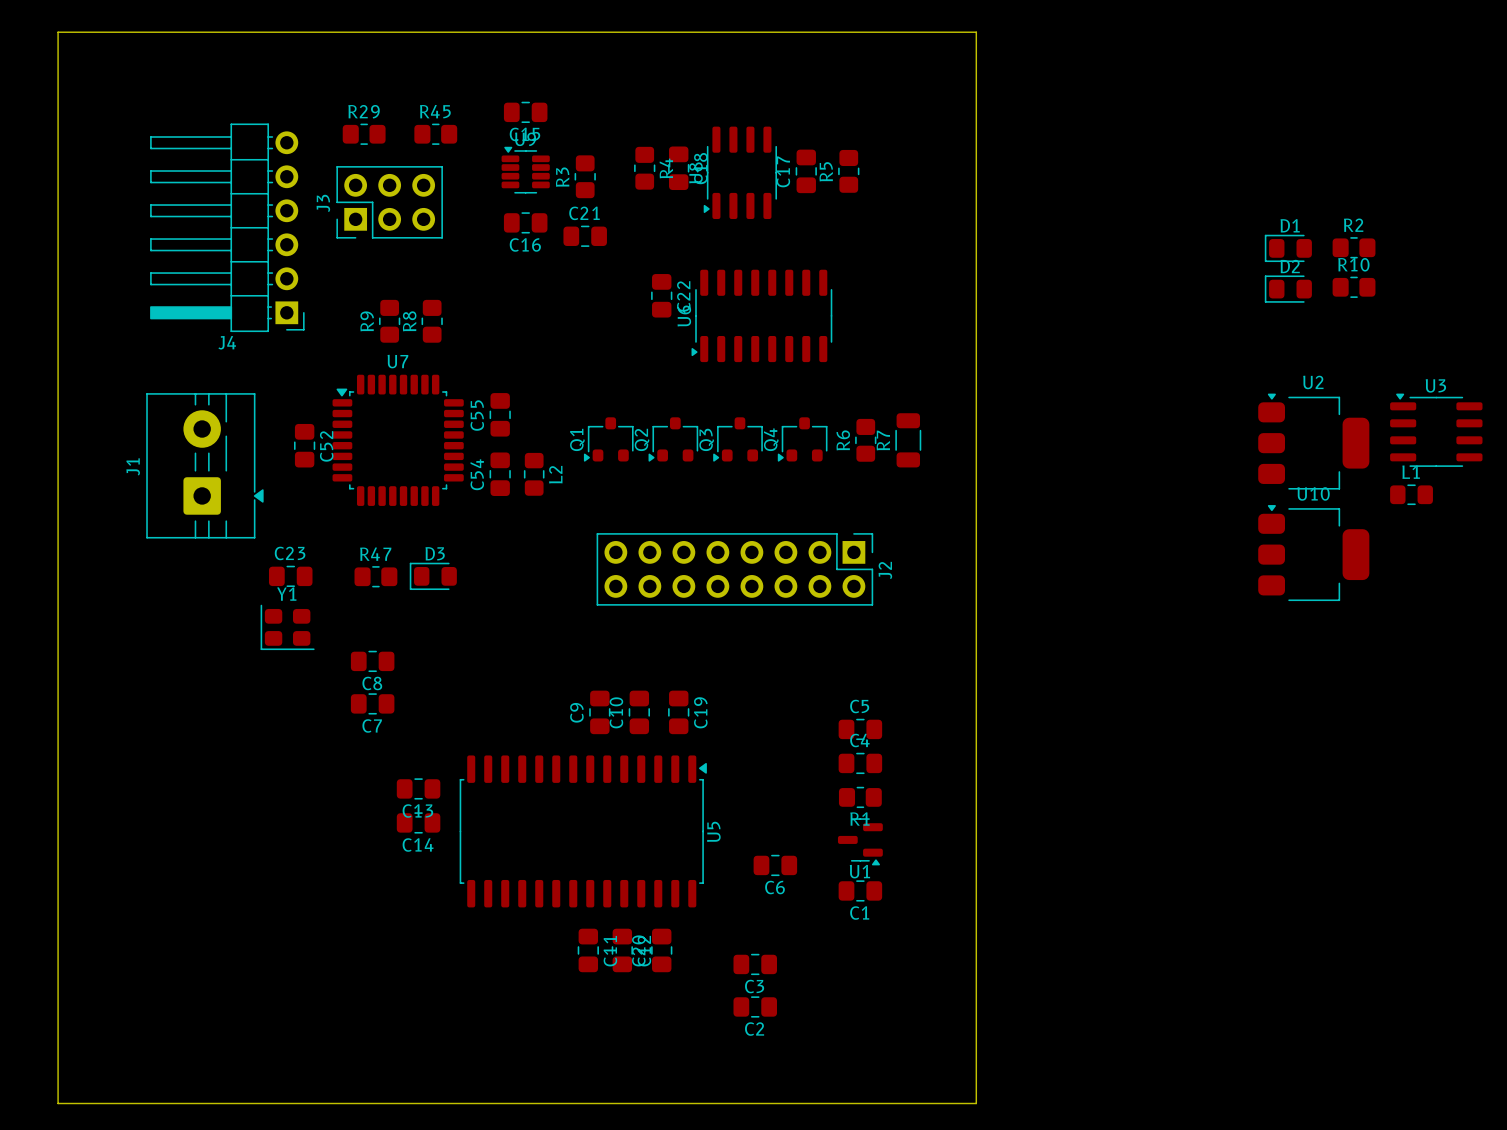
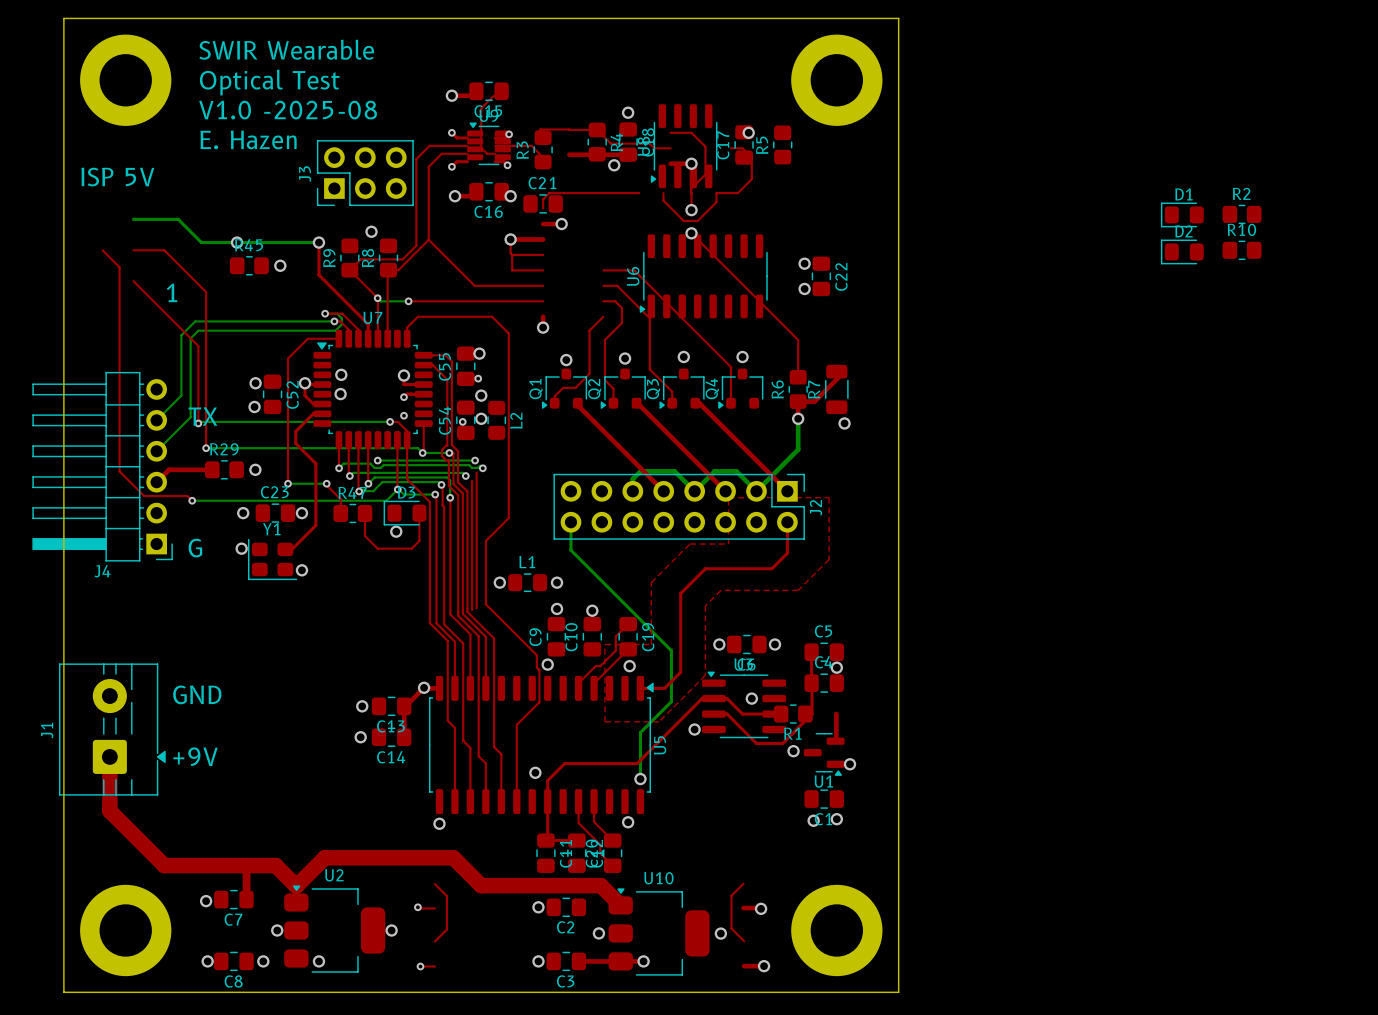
text: none -> SWIR Wearable (286, 49)
part: none -> (125, 80)
part: none -> (836, 80)
text: none -> Optical Test (269, 82)
top track: none -> (451, 95) (468, 95)
via: none -> (451, 95)
top track: none -> (493, 95) (481, 108) (481, 148) (487, 153) (495, 153)
text: none -> V1.0 -2025-08 (288, 110)
R29 position: (364, 134) -> (224, 469)
R45 position: (435, 134) -> (249, 265)
via: none -> (628, 112)
top track: none -> (540, 129) (597, 129) (610, 143) (649, 143) (654, 148) (670, 148)
top track: none -> (451, 132) (457, 137) (467, 137)
via: none -> (451, 132)
top track: none -> (670, 132) (691, 132) (705, 146) (705, 174) (691, 188) (691, 210)
via: none -> (748, 132)
top track: none -> (509, 134) (505, 137) (495, 137)
via: none -> (509, 134)
text: none -> E. Hazen (248, 139)
top track: none -> (467, 145) (429, 145) (416, 159) (416, 245) (402, 259) (360, 259) (349, 270) (377, 298) (377, 338)
top track: none -> (495, 145) (531, 145) (540, 154)
top track: none -> (730, 148) (742, 148) (751, 157) (751, 179) (737, 193) (716, 193) (716, 202) (697, 220) (683, 220) (663, 200) (663, 193)
top track: none -> (467, 153) (441, 153) (428, 166) (428, 239)
top track: none -> (569, 154) (628, 154)
top track: none -> (467, 161) (457, 161) (451, 166)
top track: none -> (495, 161) (503, 161) (507, 165)
top track: none -> (670, 163) (691, 163)
via: none -> (691, 163)
via: none -> (507, 165)
via: none -> (614, 165)
via: none -> (451, 166)
text: none -> ISP 5V (117, 177)
top track: none -> (639, 193) (549, 193) (543, 199) (543, 208)
J4 position: (227, 227) -> (102, 466)
top track: none -> (455, 196) (468, 196)
via: none -> (455, 196)
via: none -> (510, 196)
via: none -> (691, 210)
bottom track: none -> (133, 219) (178, 219) (201, 242) (318, 242)
top track: none -> (543, 224) (561, 224)
via: none -> (561, 224)
via: none -> (371, 231)
top track: none -> (691, 233) (798, 339) (798, 377)
via: none -> (691, 233)
top track: none -> (428, 239) (398, 270) (387, 271) (387, 338)
top track: none -> (428, 239) (474, 285) (543, 285)
via: none -> (510, 239)
top track: none -> (543, 239) (510, 239) (512, 254)
via: none -> (237, 242)
top track: none -> (318, 242) (318, 275) (368, 324) (368, 338)
via: none -> (318, 242)
top track: none -> (102, 250) (119, 267) (119, 471) (144, 496) (187, 496) (192, 500)
top track: none -> (133, 250) (164, 250) (206, 292) (206, 448)
top track: none -> (512, 254) (543, 254)
top track: none -> (512, 254) (512, 270) (543, 270)
C22 position: (661, 295) -> (821, 276)
via: none -> (804, 263)
via: none -> (280, 265)
top track: none -> (603, 270) (634, 270) (730, 367) (730, 403)
top track: none -> (133, 281) (198, 346) (198, 423)
R9 position: (389, 321) -> (349, 258)
R8 position: (432, 321) -> (388, 258)
top track: none -> (603, 285) (617, 285) (649, 318) (649, 369) (672, 391) (672, 403)
via: none -> (804, 288)
text: none -> 1 (171, 292)
bottom track: none -> (377, 298) (380, 301) (408, 301)
via: none -> (377, 298)
top track: none -> (408, 301) (543, 301)
via: none -> (408, 301)
top track: none -> (603, 301) (615, 301) (621, 308) (621, 322) (604, 339) (604, 380) (613, 388) (613, 403)
top track: none -> (325, 313) (342, 313) (358, 329) (358, 338)
bottom track: none -> (325, 313) (337, 313) (341, 318) (341, 324) (335, 330) (198, 330) (190, 338) (190, 417) (156, 451)
via: none -> (325, 313)
top track: none -> (543, 316) (543, 327)
top track: none -> (603, 316) (589, 330) (589, 373) (575, 387) (563, 387) (554, 396) (554, 403)
top track: none -> (334, 321) (340, 321) (348, 329) (348, 338)
bottom track: none -> (334, 321) (195, 321) (181, 335) (181, 395) (156, 420)
via: none -> (334, 321)
via: none -> (543, 327)
top track: none -> (338, 338) (307, 338) (288, 358) (288, 483)
top track: none -> (407, 338) (407, 327) (417, 316) (492, 316) (508, 333) (508, 518) (485, 540) (485, 604) (536, 655) (536, 667) (539, 670) (539, 702) (516, 724) (516, 801)
via: none -> (479, 353)
top track: none -> (423, 355) (445, 355) (451, 361) (451, 445) (458, 451) (458, 482) (467, 491) (467, 608)
via: none -> (683, 356)
via: none -> (742, 357)
via: none -> (625, 358)
via: none -> (566, 360)
top track: none -> (423, 365) (432, 365) (447, 379) (447, 445) (441, 449) (441, 456) (448, 460) (448, 486) (458, 495) (458, 615) (478, 636) (478, 756) (485, 763)
top track: none -> (844, 371) (814, 401) (798, 401) (798, 418)
via: none -> (341, 374)
top track: none -> (403, 375) (404, 384) (423, 384)
via: none -> (403, 375)
via: none -> (478, 378)
U3 position: (1436, 430) -> (744, 704)
via: none -> (255, 383)
via: none -> (305, 383)
top track: none -> (322, 384) (305, 383) (305, 395) (313, 404) (322, 404)
U2 position: (1313, 441) -> (334, 929)
C52 position: (304, 445) -> (272, 394)
via: none -> (340, 394)
top track: none -> (423, 394) (407, 394) (403, 397)
via: none -> (481, 395)
via: none -> (403, 397)
top track: none -> (577, 403) (577, 405) (663, 491)
top track: none -> (636, 403) (725, 491)
top track: none -> (695, 403) (699, 403) (787, 491)
via: none -> (254, 406)
J1 position: (204, 465) -> (112, 729)
top track: none -> (322, 413) (313, 413) (295, 431) (295, 443) (315, 463) (315, 525) (291, 549) (285, 549)
via: none -> (403, 415)
bottom track: none -> (798, 415) (798, 449) (756, 491) (736, 471) (714, 471) (694, 491)
text: none -> TX (202, 416)
via: none -> (481, 418)
via: none -> (798, 418)
top track: none -> (390, 421) (397, 421) (407, 431) (407, 479) (429, 501) (429, 623) (447, 641) (447, 720) (454, 727) (454, 801)
bottom track: none -> (390, 421) (199, 421) (198, 423)
via: none -> (390, 421)
via: none -> (462, 421)
via: none -> (198, 423)
top track: none -> (423, 423) (422, 452)
via: none -> (844, 423)
L1 position: (1411, 494) -> (527, 582)
top track: none -> (338, 440) (338, 468)
top track: none -> (348, 440) (349, 476)
top track: none -> (358, 440) (359, 491)
top track: none -> (368, 440) (368, 483)
top track: none -> (397, 440) (397, 489)
bottom track: none -> (206, 448) (417, 448) (422, 452) (449, 452)
via: none -> (206, 448)
via: none -> (422, 452)
top track: none -> (449, 452) (451, 451) (453, 453) (453, 484) (462, 493) (462, 610)
via: none -> (449, 452)
bottom track: none -> (377, 460) (475, 460)
via: none -> (377, 460)
via: none -> (475, 460)
bottom track: none -> (339, 468) (343, 463) (370, 463) (374, 467) (380, 467) (383, 465) (469, 465) (472, 467) (478, 467) (480, 465) (482, 468)
via: none -> (339, 468)
via: none -> (482, 468)
top track: none -> (212, 469) (169, 469) (156, 482)
via: none -> (255, 469)
top track: none -> (476, 472) (476, 608)
bottom track: none -> (349, 476) (353, 472) (462, 472) (465, 476)
via: none -> (349, 476)
via: none -> (465, 476)
top track: none -> (472, 480) (472, 610)
bottom track: none -> (288, 483) (326, 483)
via: none -> (288, 483)
top track: none -> (326, 483) (340, 499) (340, 513)
via: none -> (326, 483)
bottom track: none -> (368, 483) (374, 477) (447, 477) (450, 480) (450, 497)
via: none -> (368, 483)
top track: none -> (441, 484) (444, 506) (444, 624) (463, 643) (463, 740) (470, 748) (470, 801)
bottom track: none -> (441, 484) (438, 482) (382, 482) (373, 491) (360, 489) (359, 491)
via: none -> (441, 484)
via: none -> (397, 489)
via: none -> (359, 491)
bottom track: none -> (632, 491) (632, 479) (640, 471) (674, 471) (694, 491)
U10 position: (1313, 553) -> (659, 932)
top track: none -> (435, 494) (436, 623) (454, 641) (454, 688)
bottom track: none -> (435, 494) (403, 494) (397, 488) (386, 500) (192, 500)
via: none -> (435, 494)
top track: none -> (450, 497) (450, 614) (470, 634) (470, 688)
via: none -> (450, 497)
top zone outline: none -> (728, 497) (728, 544) (689, 544) (651, 582) (651, 644) (604, 644) (604, 721) (659, 721) (705, 675) (705, 605) (720, 590) (798, 590) (829, 559) (829, 497) (728, 497)
via: none -> (192, 500)
via: none -> (243, 513)
via: none -> (301, 513)
top track: none -> (419, 513) (419, 540) (411, 548) (377, 548) (365, 535) (365, 513)
bottom track: none -> (570, 522) (570, 550) (671, 650) (671, 701) (640, 732) (640, 779)
top track: none -> (787, 522) (787, 553) (771, 568) (705, 568) (680, 593) (680, 672) (664, 688) (640, 688)
via: none -> (396, 531)
text: none -> G (195, 548)
via: none -> (241, 548)
via: none -> (301, 570)
via: none -> (499, 582)
via: none -> (557, 582)
C8 position: (372, 661) -> (233, 961)
top track: none -> (467, 608) (467, 611) (494, 638) (494, 747) (501, 754) (501, 801)
via: none -> (557, 608)
top track: none -> (462, 610) (462, 613) (485, 636) (485, 688)
via: none -> (592, 610)
top track: none -> (628, 624) (615, 636) (615, 650) (600, 666) (595, 666) (578, 683) (578, 688)
C7 position: (372, 703) -> (233, 899)
via: none -> (719, 644)
via: none -> (774, 644)
top track: none -> (628, 649) (594, 683) (594, 688)
C5 position: (860, 729) -> (824, 652)
top track: none -> (811, 652) (812, 714) (782, 743) (756, 743) (727, 714) (713, 714)
via: none -> (547, 664)
via: none -> (629, 666)
via: none -> (836, 667)
C4 position: (860, 763) -> (824, 683)
via: none -> (424, 687)
top track: none -> (439, 688) (424, 687) (404, 706) (404, 737)
text: none -> GND (197, 694)
via: none -> (751, 698)
via: none -> (362, 706)
top track: none -> (774, 714) (742, 714) (727, 698) (702, 698) (637, 763) (564, 763) (547, 780) (547, 838) (545, 840) (576, 840)
top track: none -> (836, 714) (835, 741)
via: none -> (694, 729)
via: none -> (360, 737)
via: none -> (793, 751)
U1 position: (860, 841) -> (824, 754)
top track: none -> (109, 756) (109, 811) (164, 865) (275, 865) (296, 886) (324, 857) (453, 857) (481, 885) (600, 885) (620, 905)
text: none -> +9V (195, 756)
top track: none -> (485, 763) (485, 801)
via: none -> (850, 764)
via: none -> (535, 772)
C6 position: (775, 865) -> (746, 644)
via: none -> (640, 779)
C1 position: (860, 890) -> (824, 799)
top track: none -> (578, 801) (578, 823) (600, 844) (600, 853) (612, 865)
top track: none -> (594, 801) (594, 821) (612, 840)
via: none -> (836, 819)
via: none -> (813, 820)
via: none -> (628, 822)
via: none -> (439, 823)
top track: none -> (243, 865) (246, 868) (246, 899)
C3 position: (755, 964) -> (566, 961)
top track: none -> (434, 884) (446, 896) (446, 929) (434, 941)
top track: none -> (743, 883) (731, 895) (731, 928) (744, 941)
via: none -> (206, 901)
C2 position: (755, 1006) -> (566, 907)
top track: none -> (417, 907) (434, 908)
via: none -> (417, 907)
via: none -> (538, 907)
top track: none -> (743, 908) (761, 908)
via: none -> (761, 908)
part: none -> (125, 930)
via: none -> (277, 930)
via: none -> (391, 930)
part: none -> (836, 930)
via: none -> (598, 933)
via: none -> (720, 933)
via: none -> (207, 961)
via: none -> (263, 961)
via: none -> (318, 961)
via: none -> (538, 961)
top track: none -> (578, 961) (643, 961)
via: none -> (643, 961)
top track: none -> (744, 966) (764, 966)
via: none -> (764, 966)
via: none -> (420, 966)
top track: none -> (434, 966) (419, 967)

